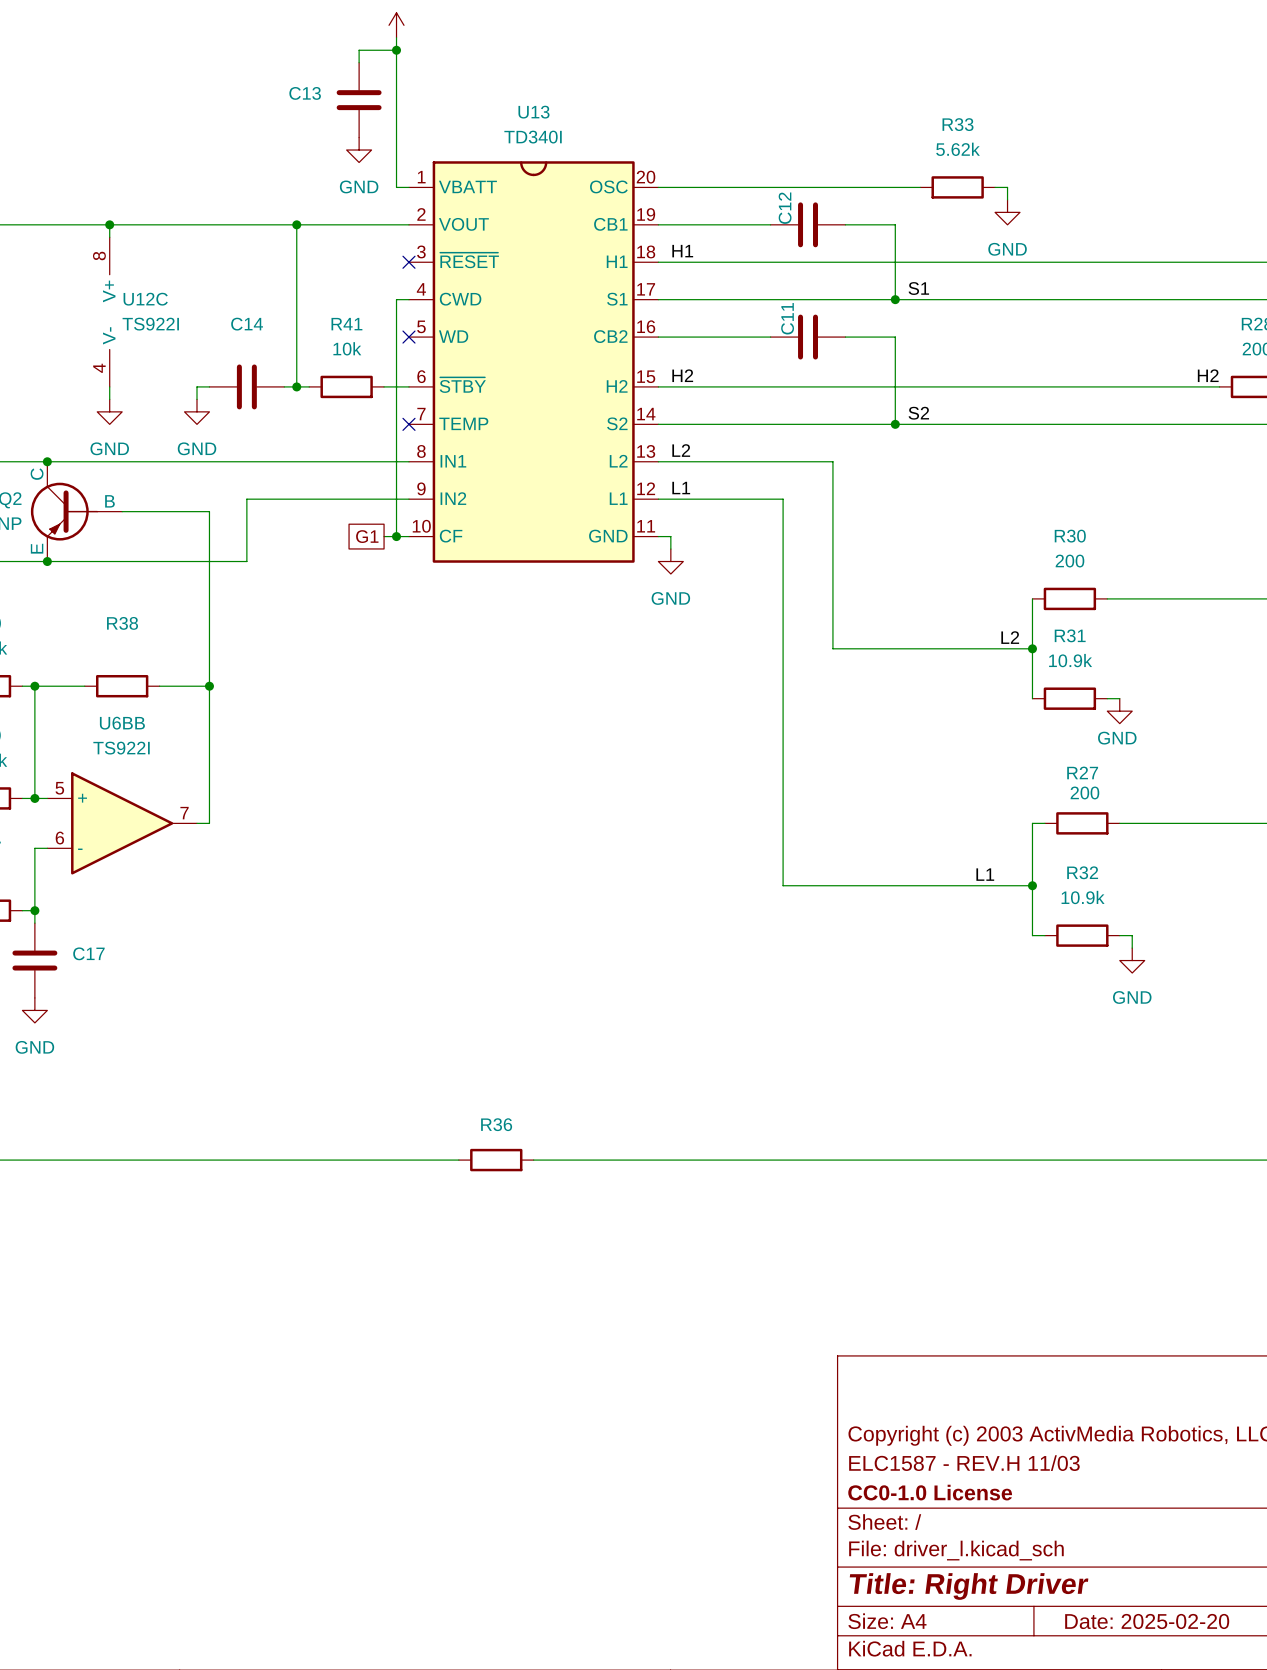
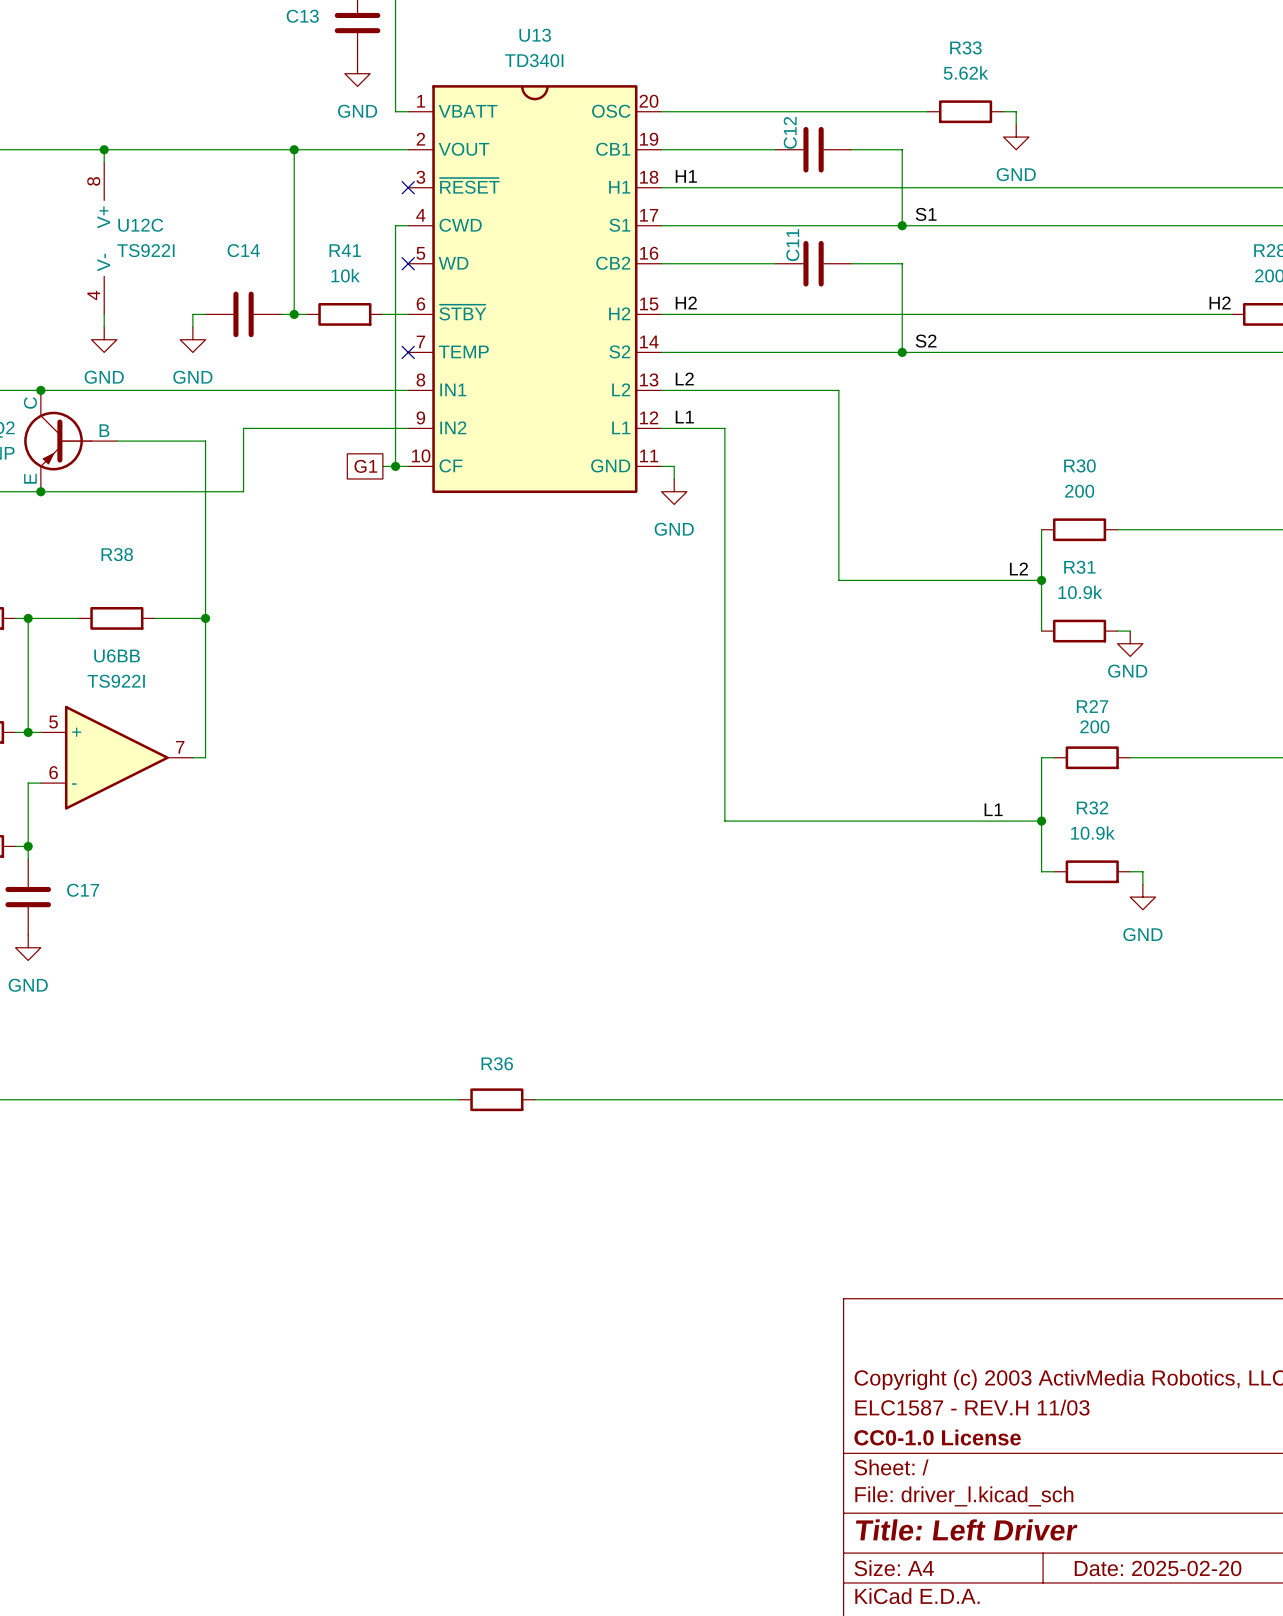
wire: (720, 499) (783, 499) (783, 885) -> (724, 428) (724, 821) (788, 821)
title block: Title: Right Driver (969, 1586) -> Title: Left Driver (966, 1529)

